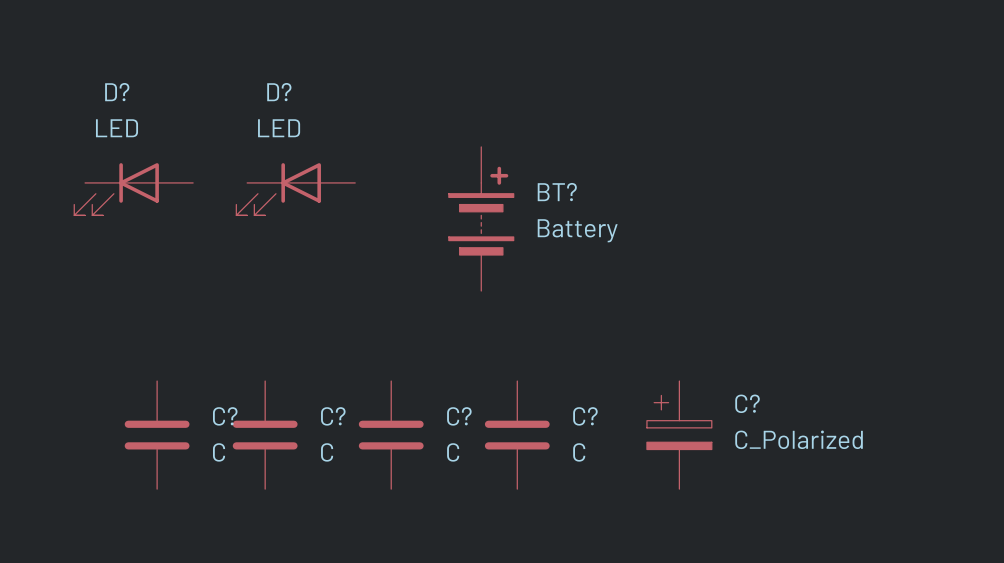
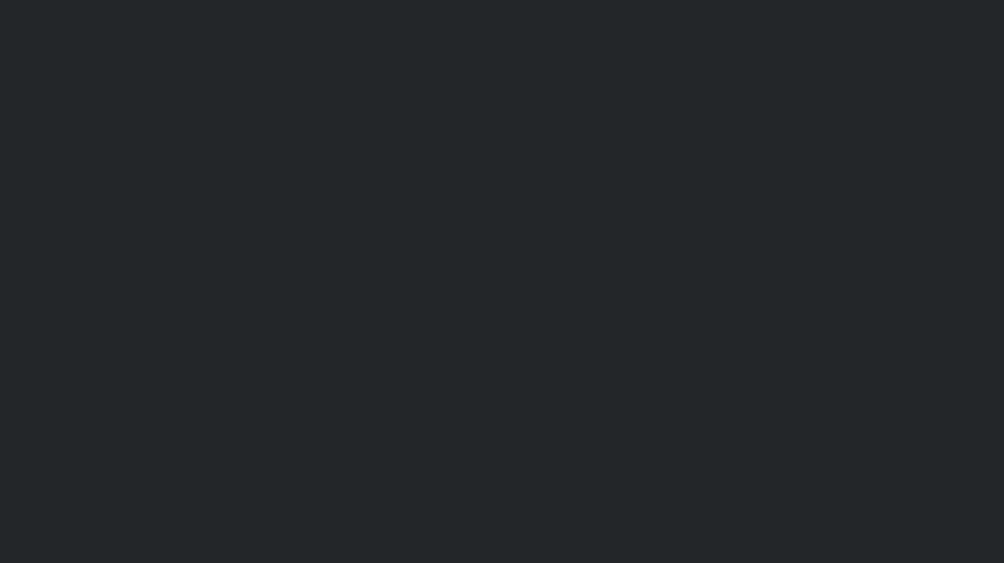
D?: LED (133, 189) -> none
D?: LED (295, 189) -> none
BT?: Battery (481, 218) -> none
C?: C (157, 435) -> none
C?: C (265, 435) -> none
C?: C (391, 435) -> none
C?: C (517, 435) -> none
C?: C_Polarized (679, 435) -> none

